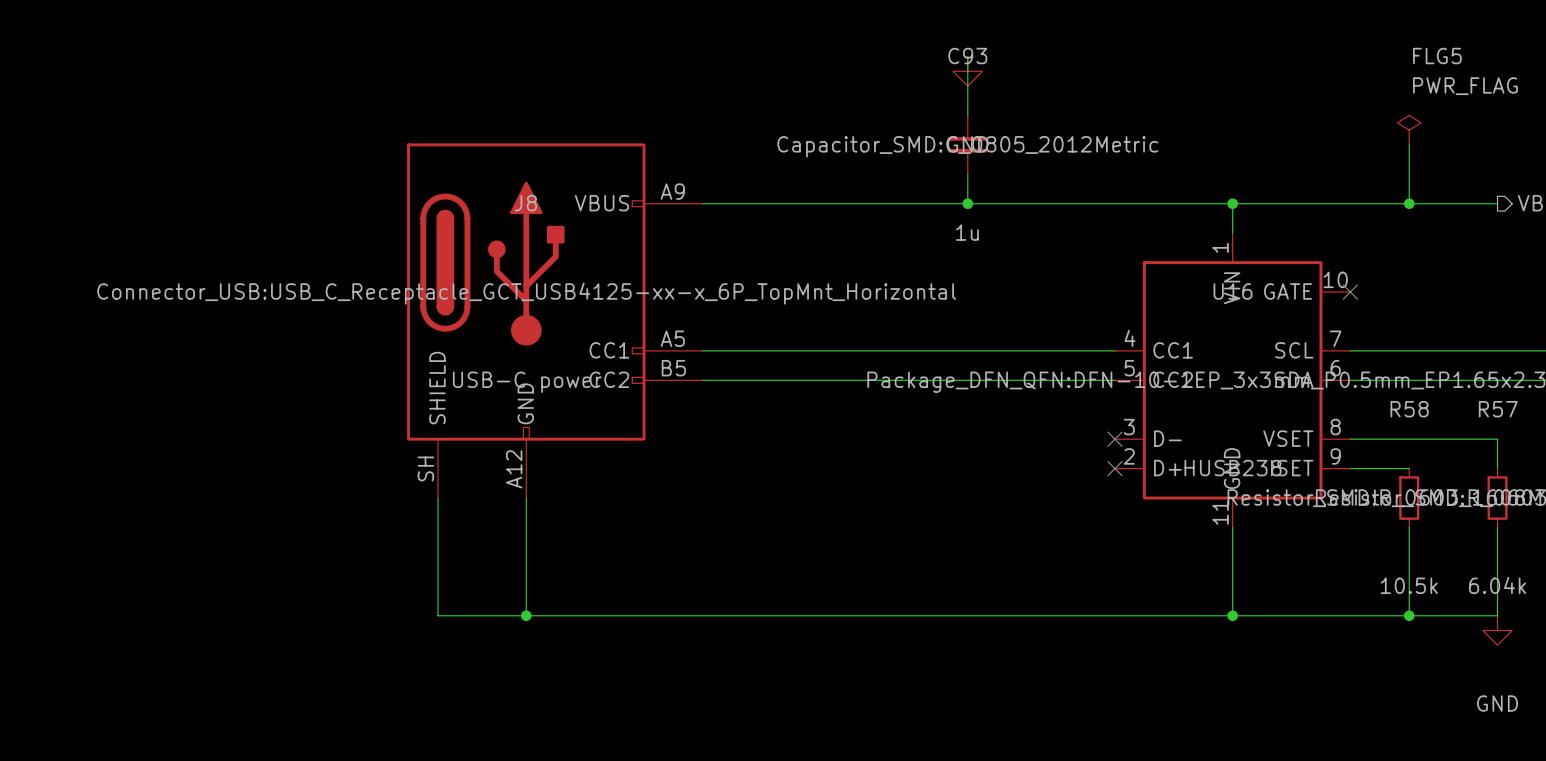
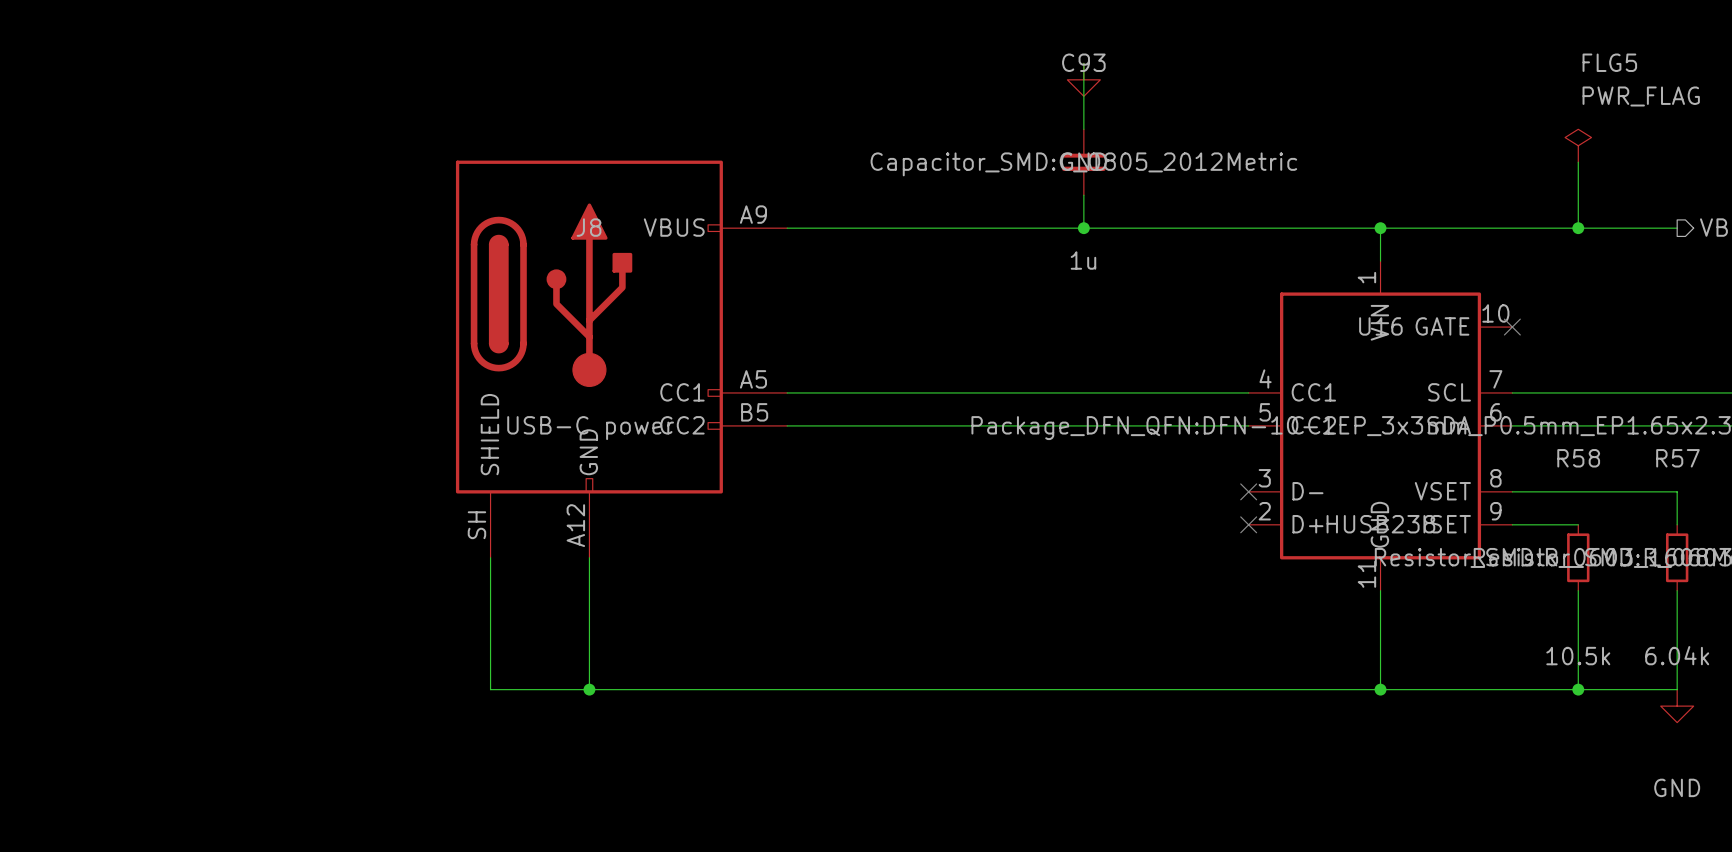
J8 text: Connector_USB:USB_C_Receptacle_GCT_USB4125-xx-x_6P_TopMnt_Horizontal (526, 293) -> none

